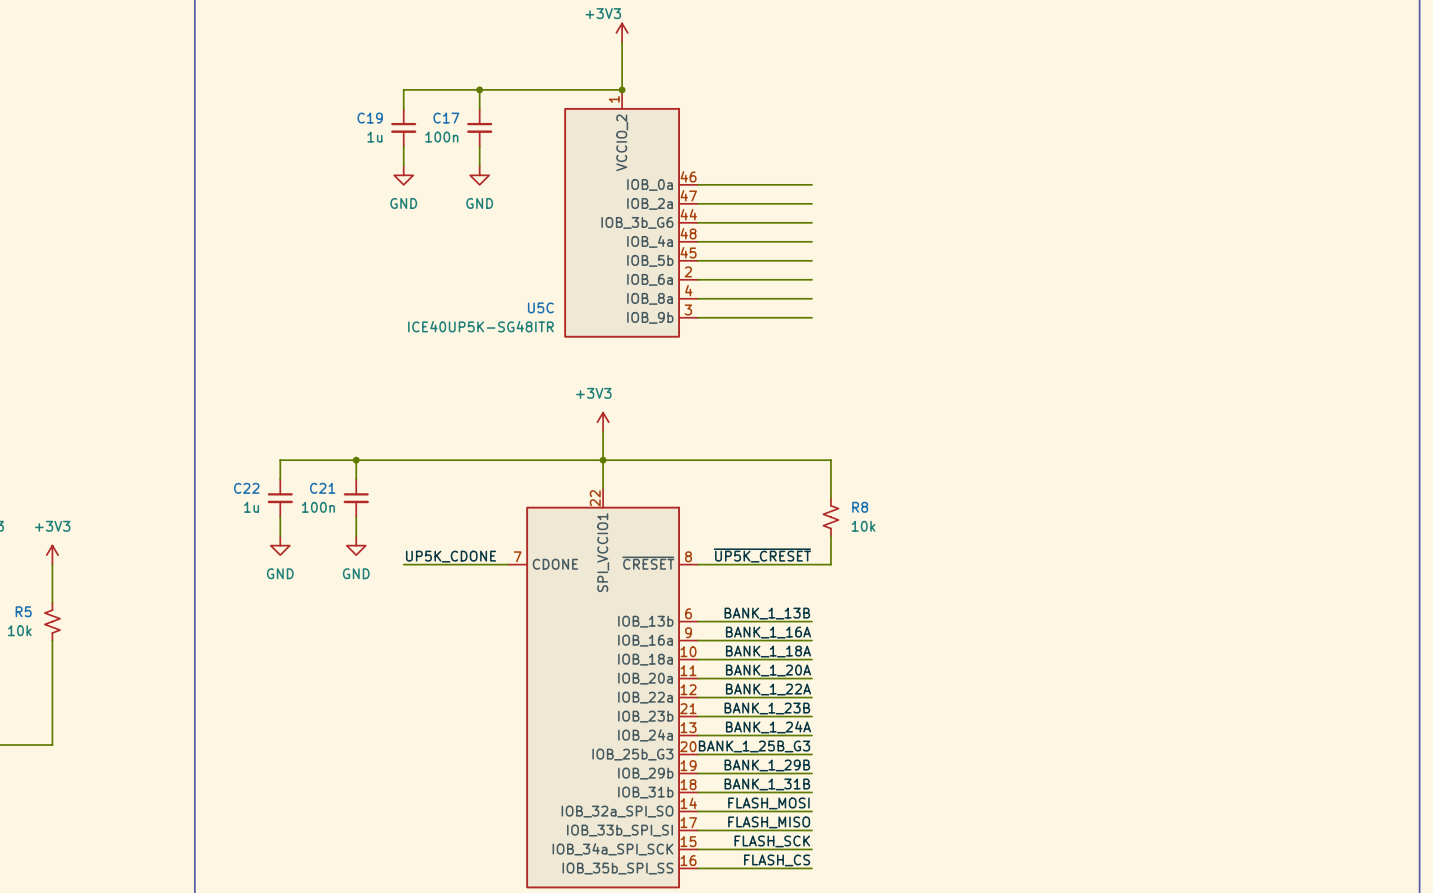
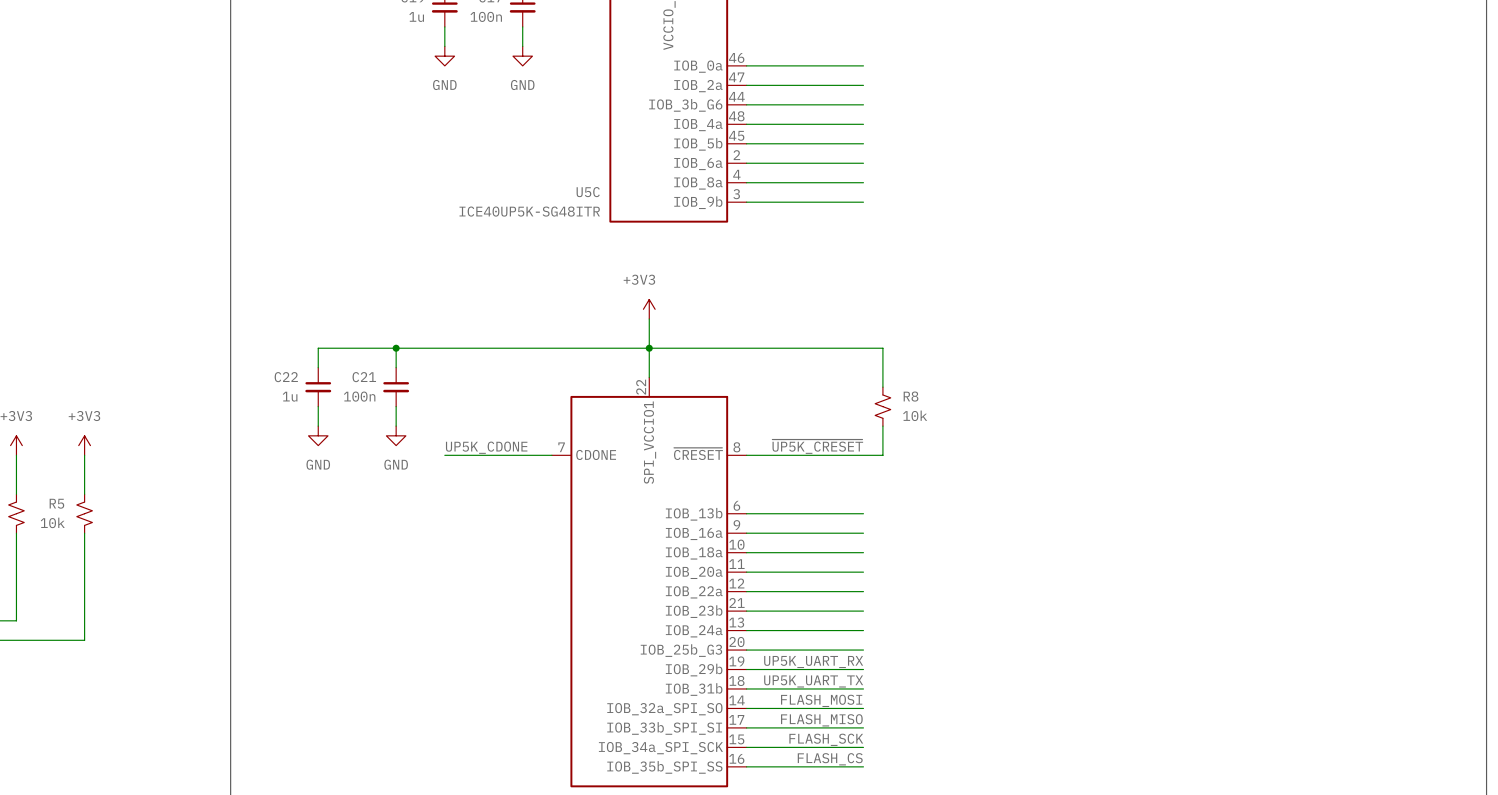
label: BANK_1_13B (767, 613) -> none
label: BANK_1_16A (768, 632) -> none
label: BANK_1_18A (768, 651) -> none
label: BANK_1_20A (768, 670) -> none
label: BANK_1_22A (768, 689) -> none
label: BANK_1_23B (767, 708) -> none
label: BANK_1_24A (768, 727) -> none
label: BANK_1_25B_G3 (754, 746) -> none
label: BANK_1_29B (767, 765) -> UP5K_UART_RX (813, 662)
label: BANK_1_31B (767, 784) -> UP5K_UART_TX (813, 681)

